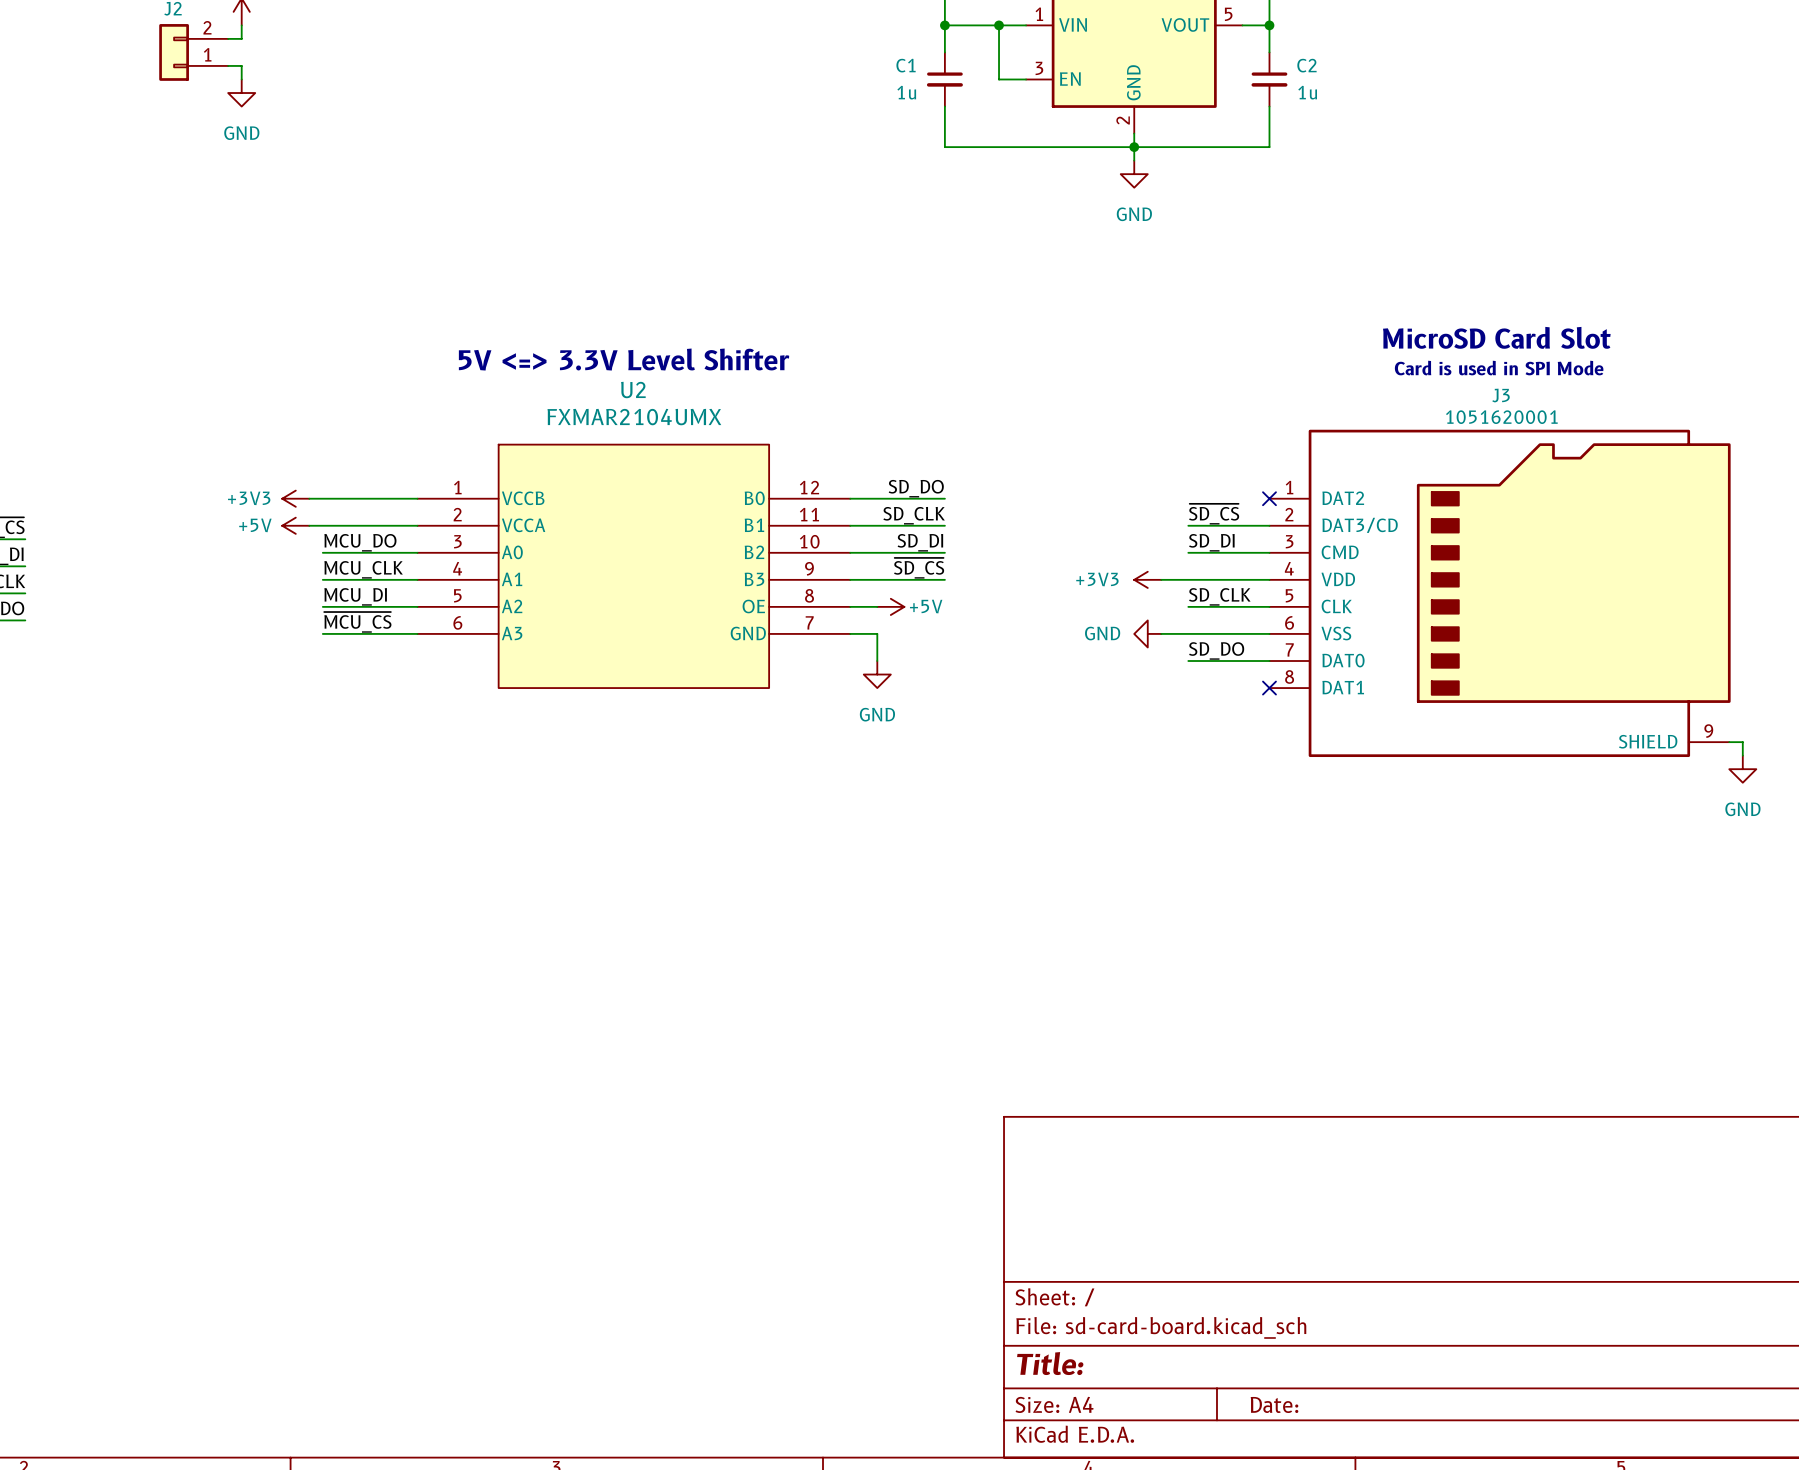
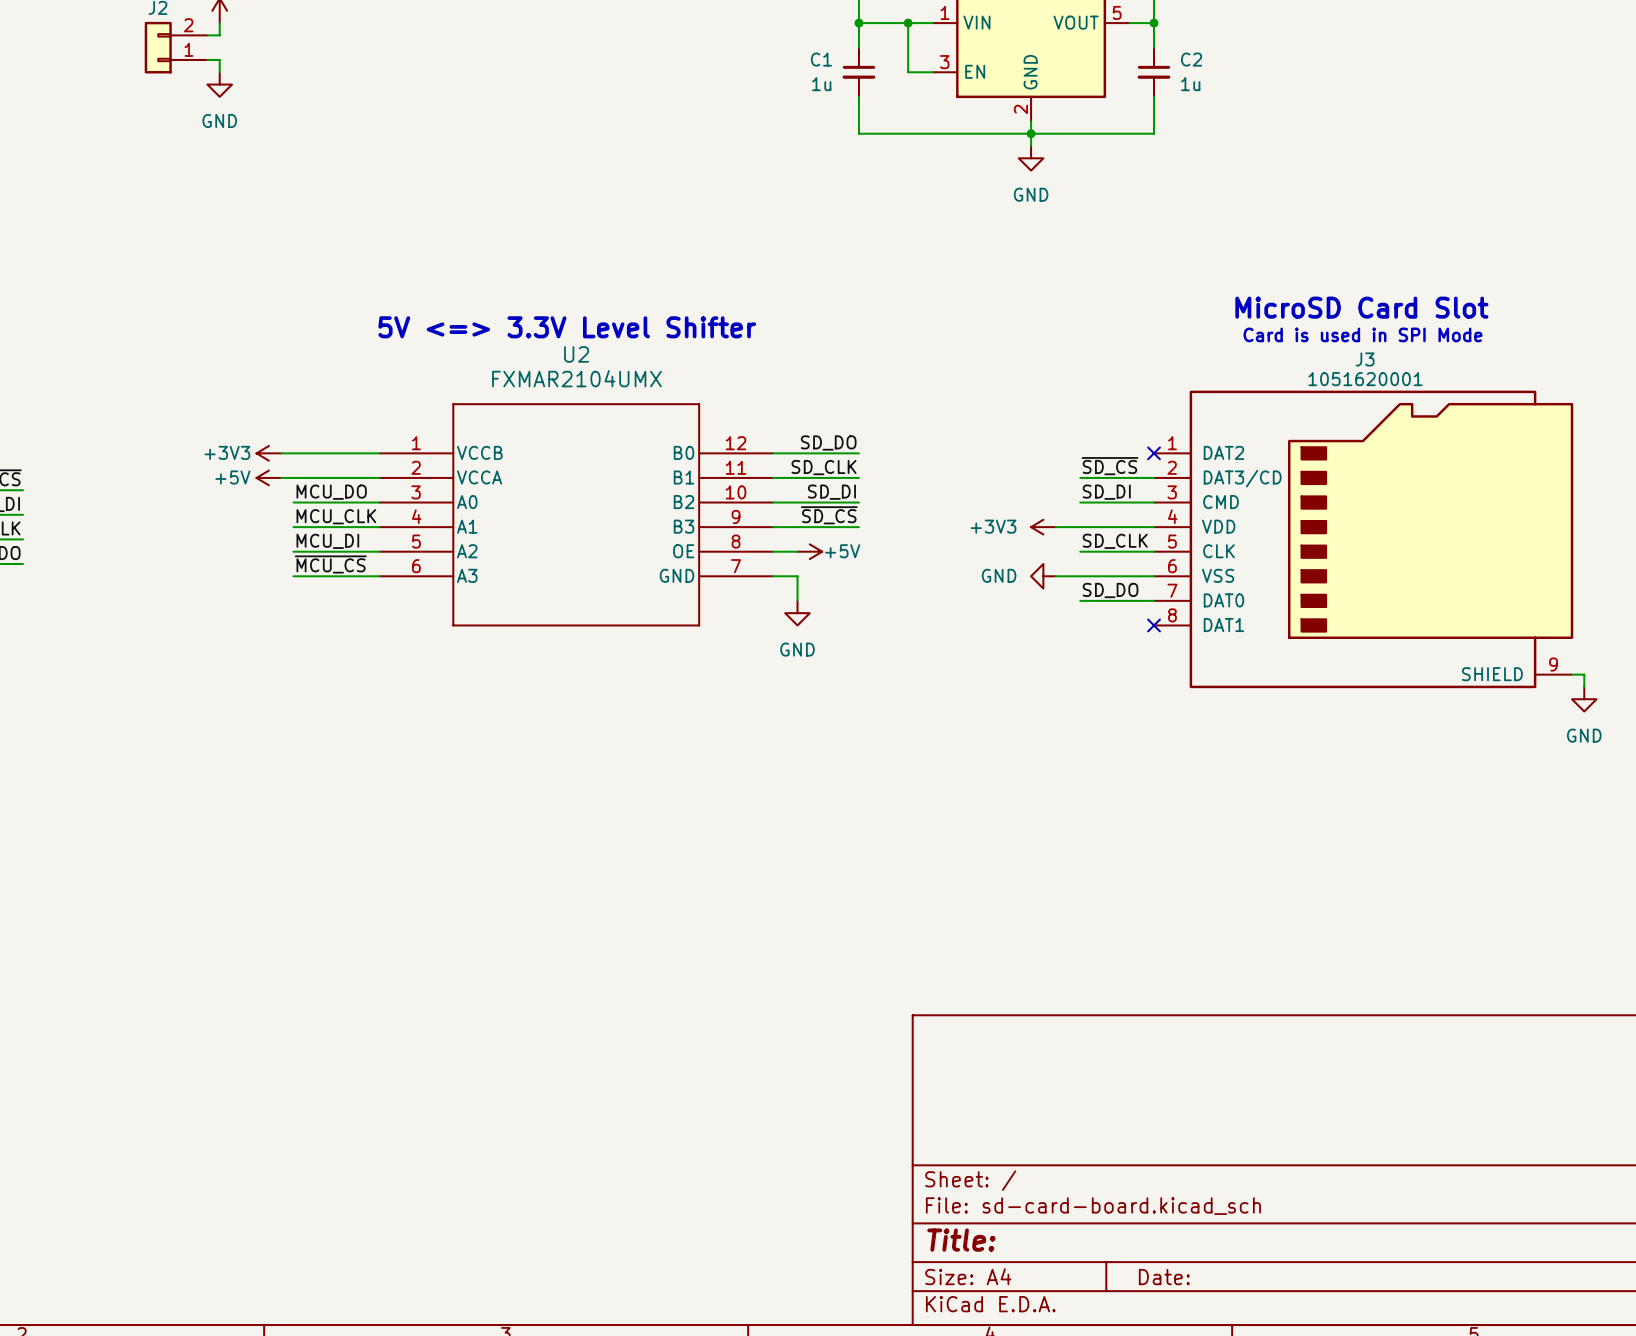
U2 symbol: [417, 444, 851, 689] -> [379, 403, 773, 627]

